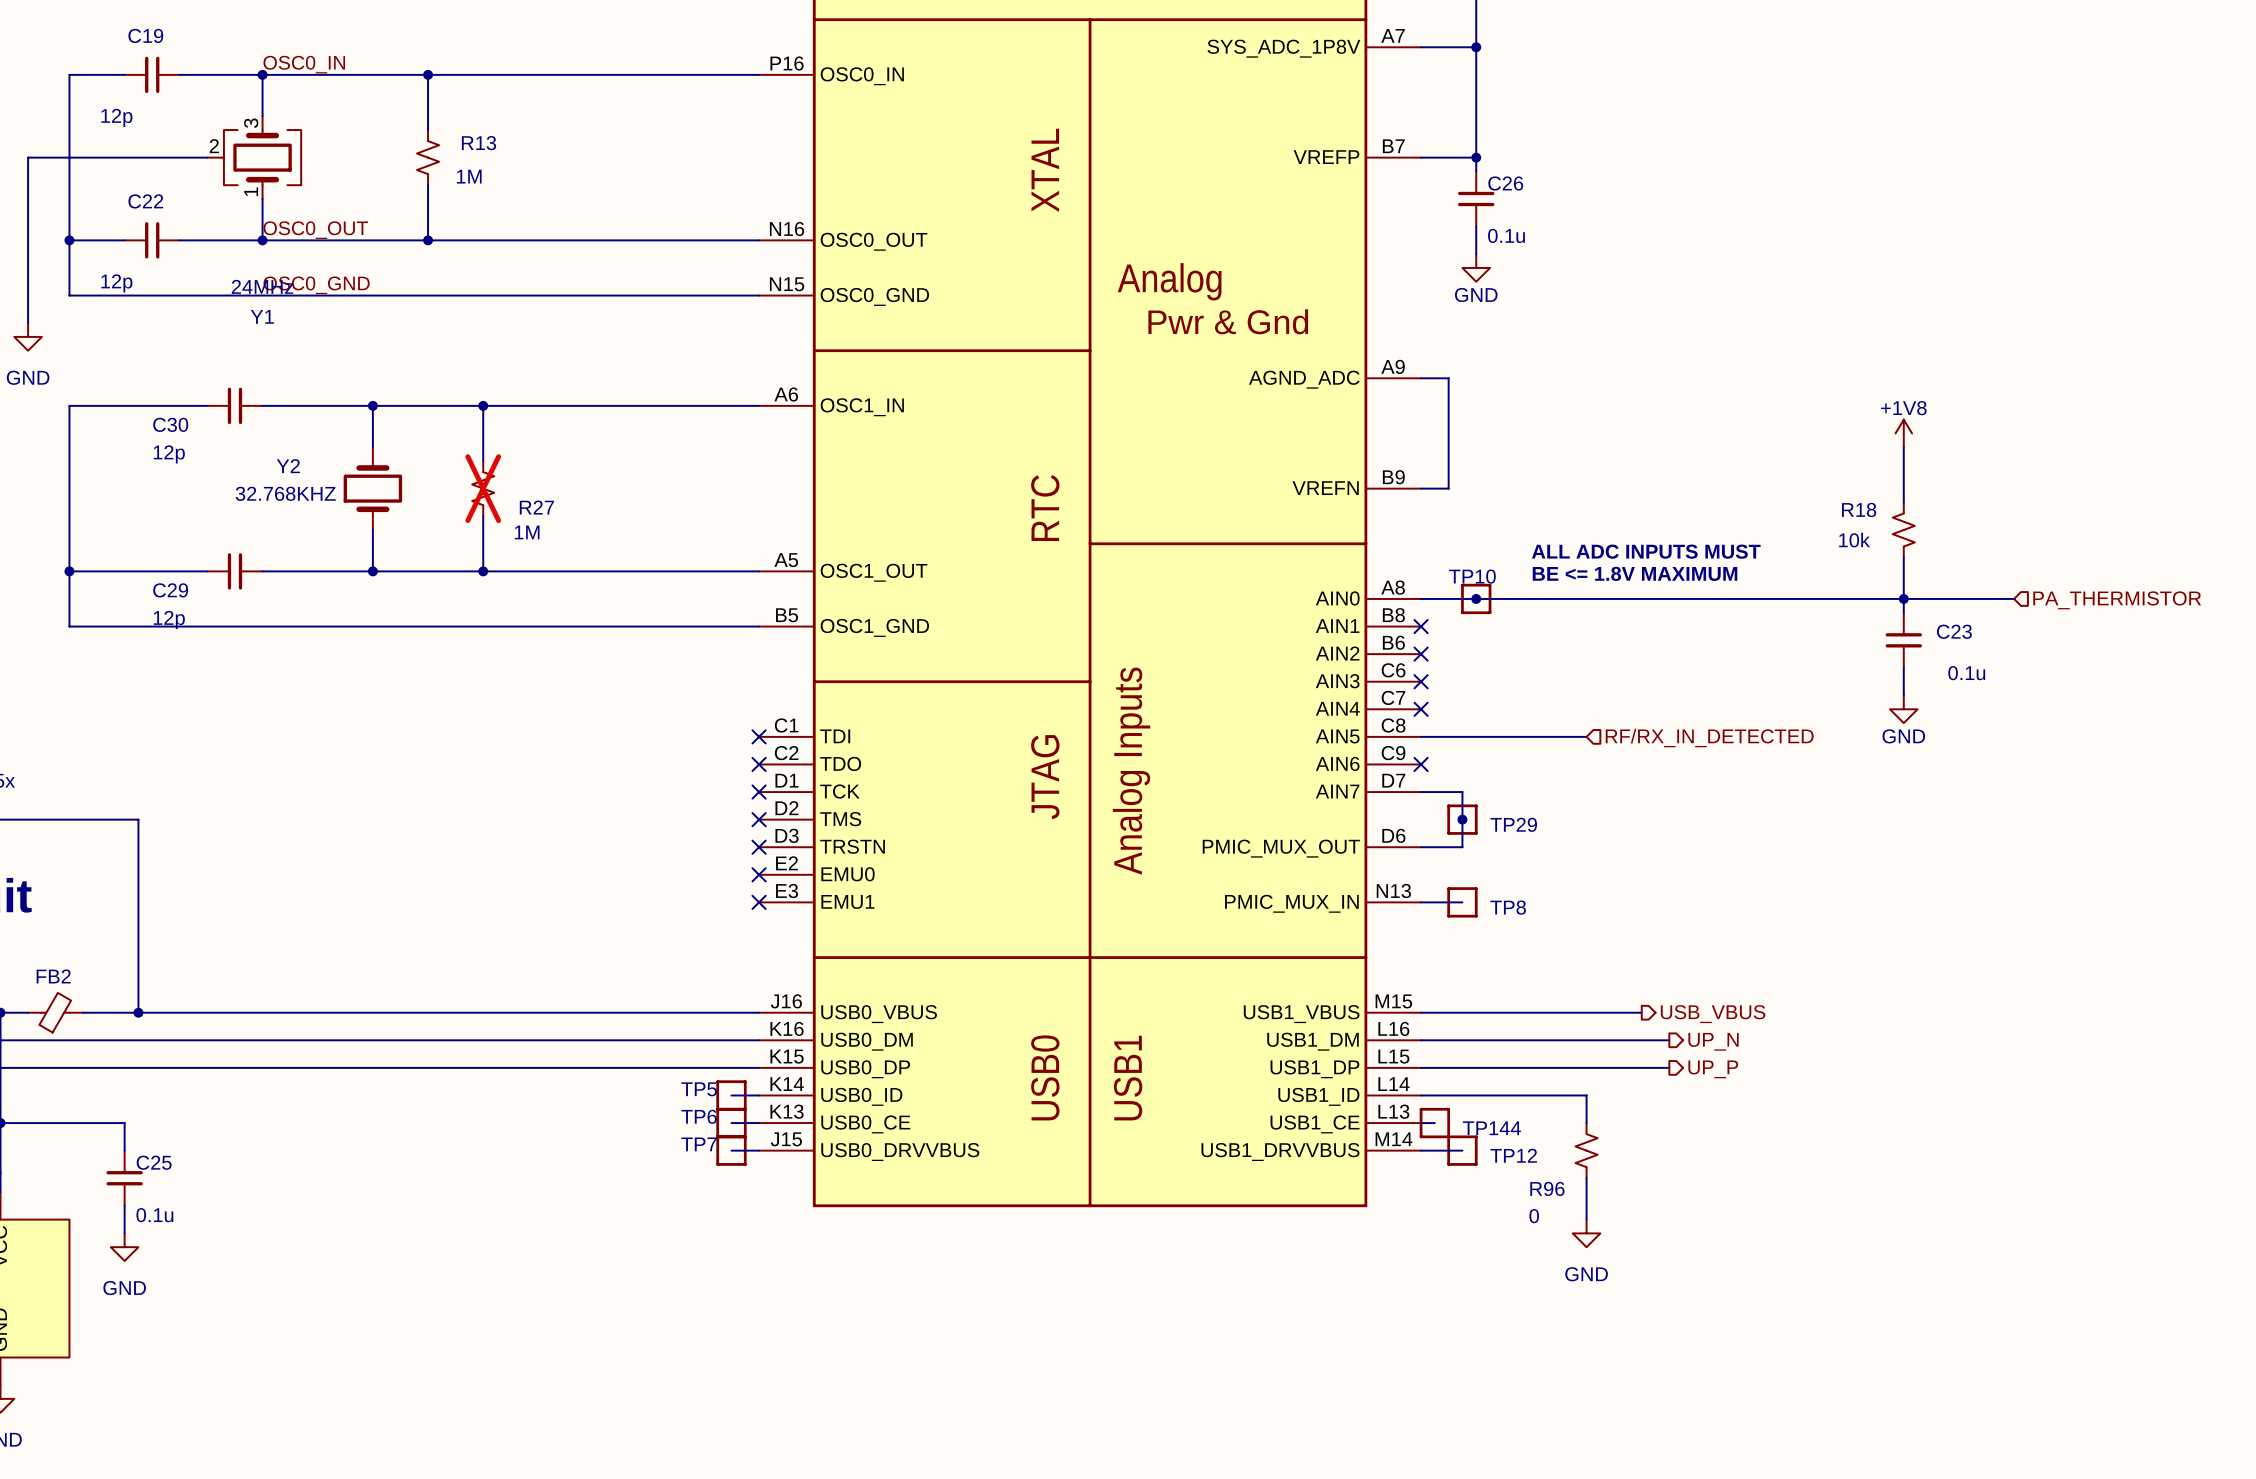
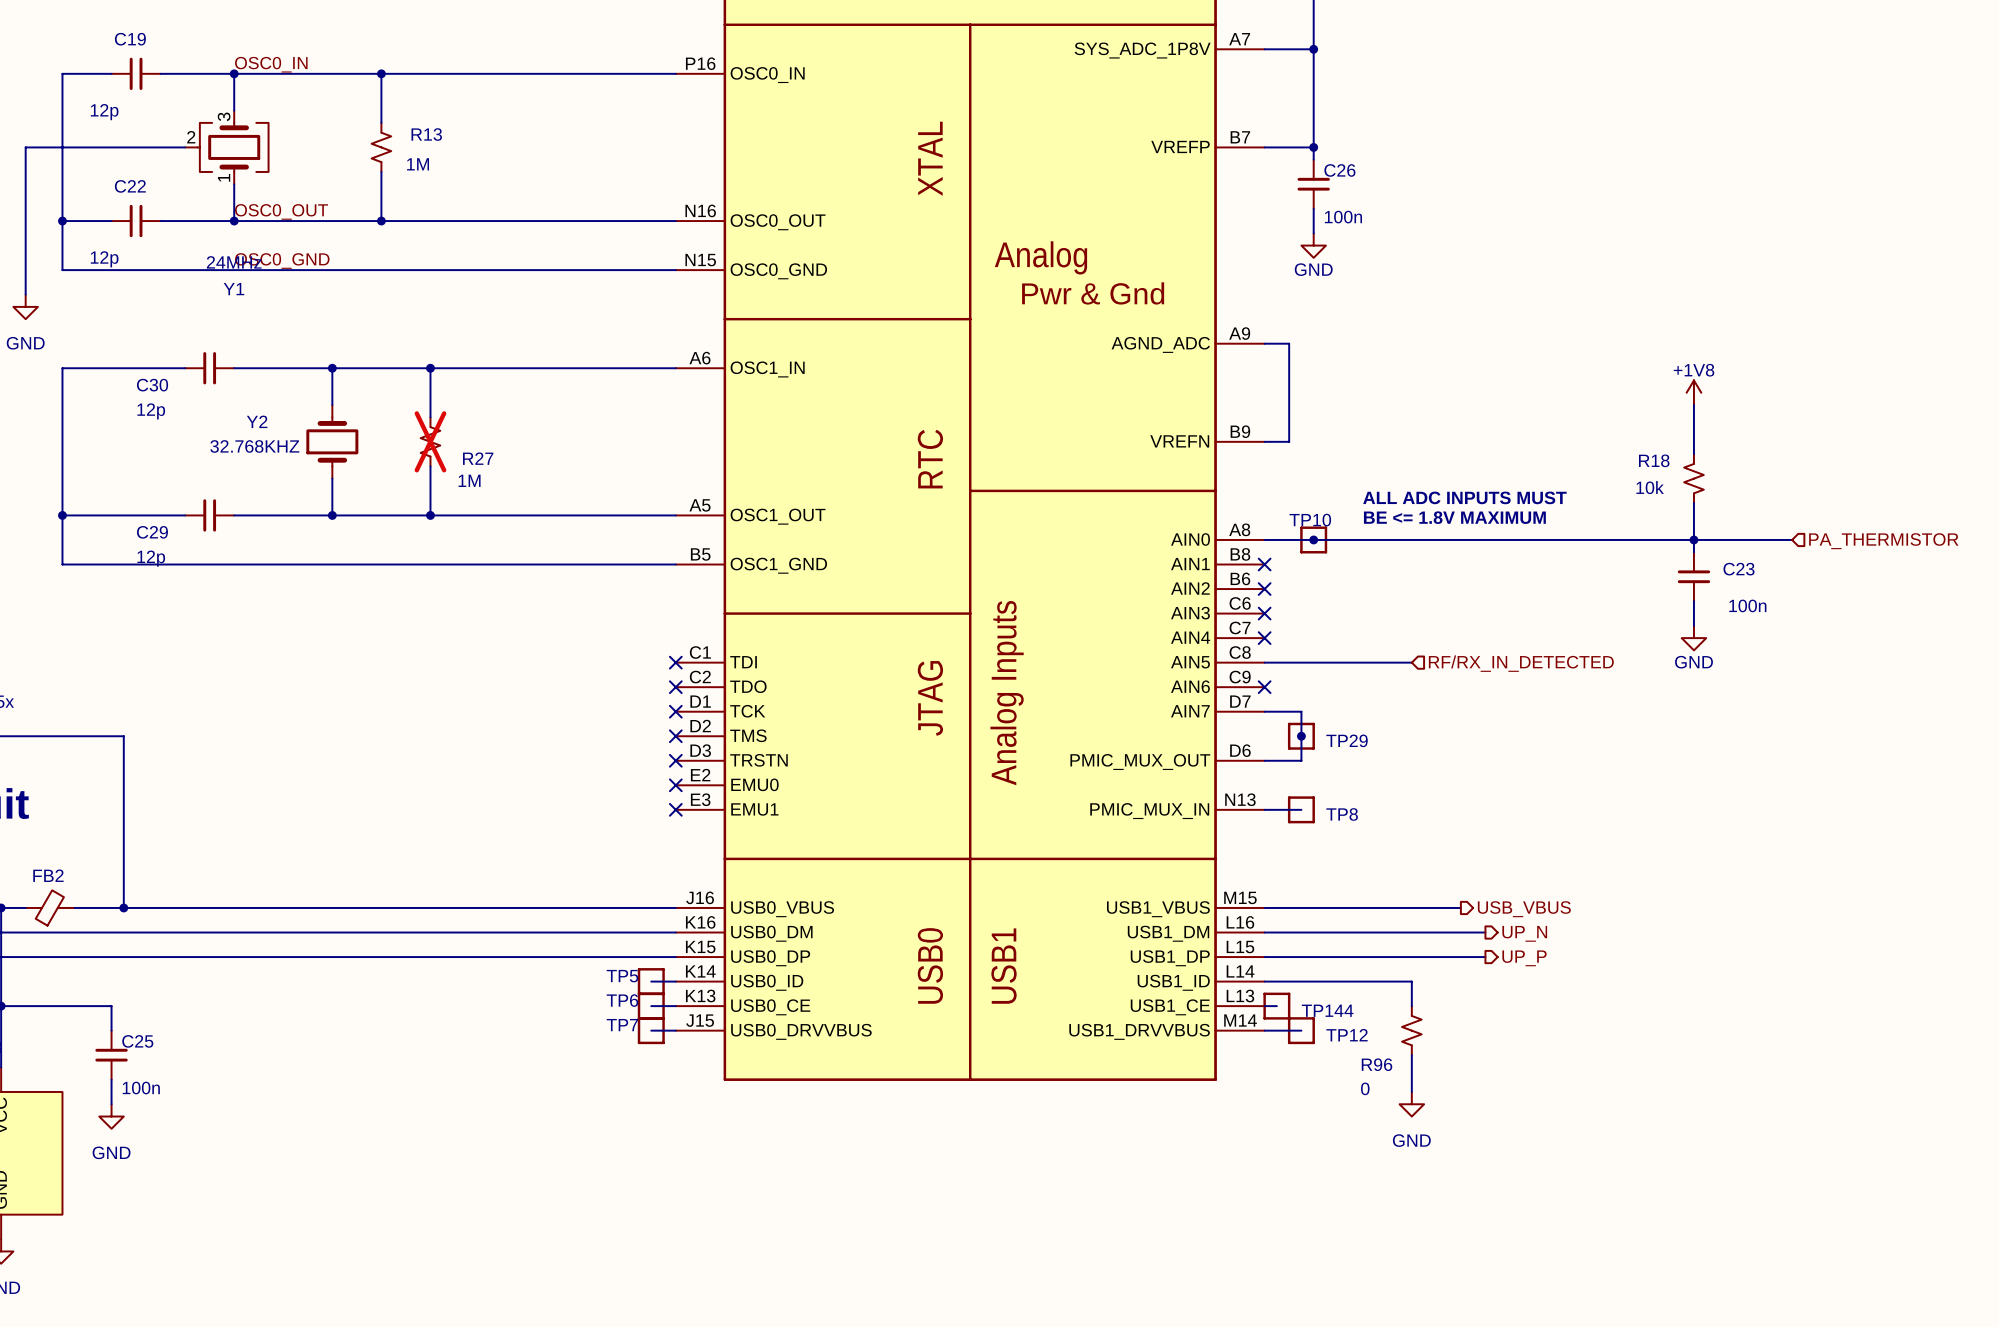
C26 value: 0.1u (1506, 235) -> 100n (1343, 217)
C23 value: 0.1u (1966, 673) -> 100n (1747, 605)
C25 value: 0.1u (154, 1215) -> 100n (141, 1088)

